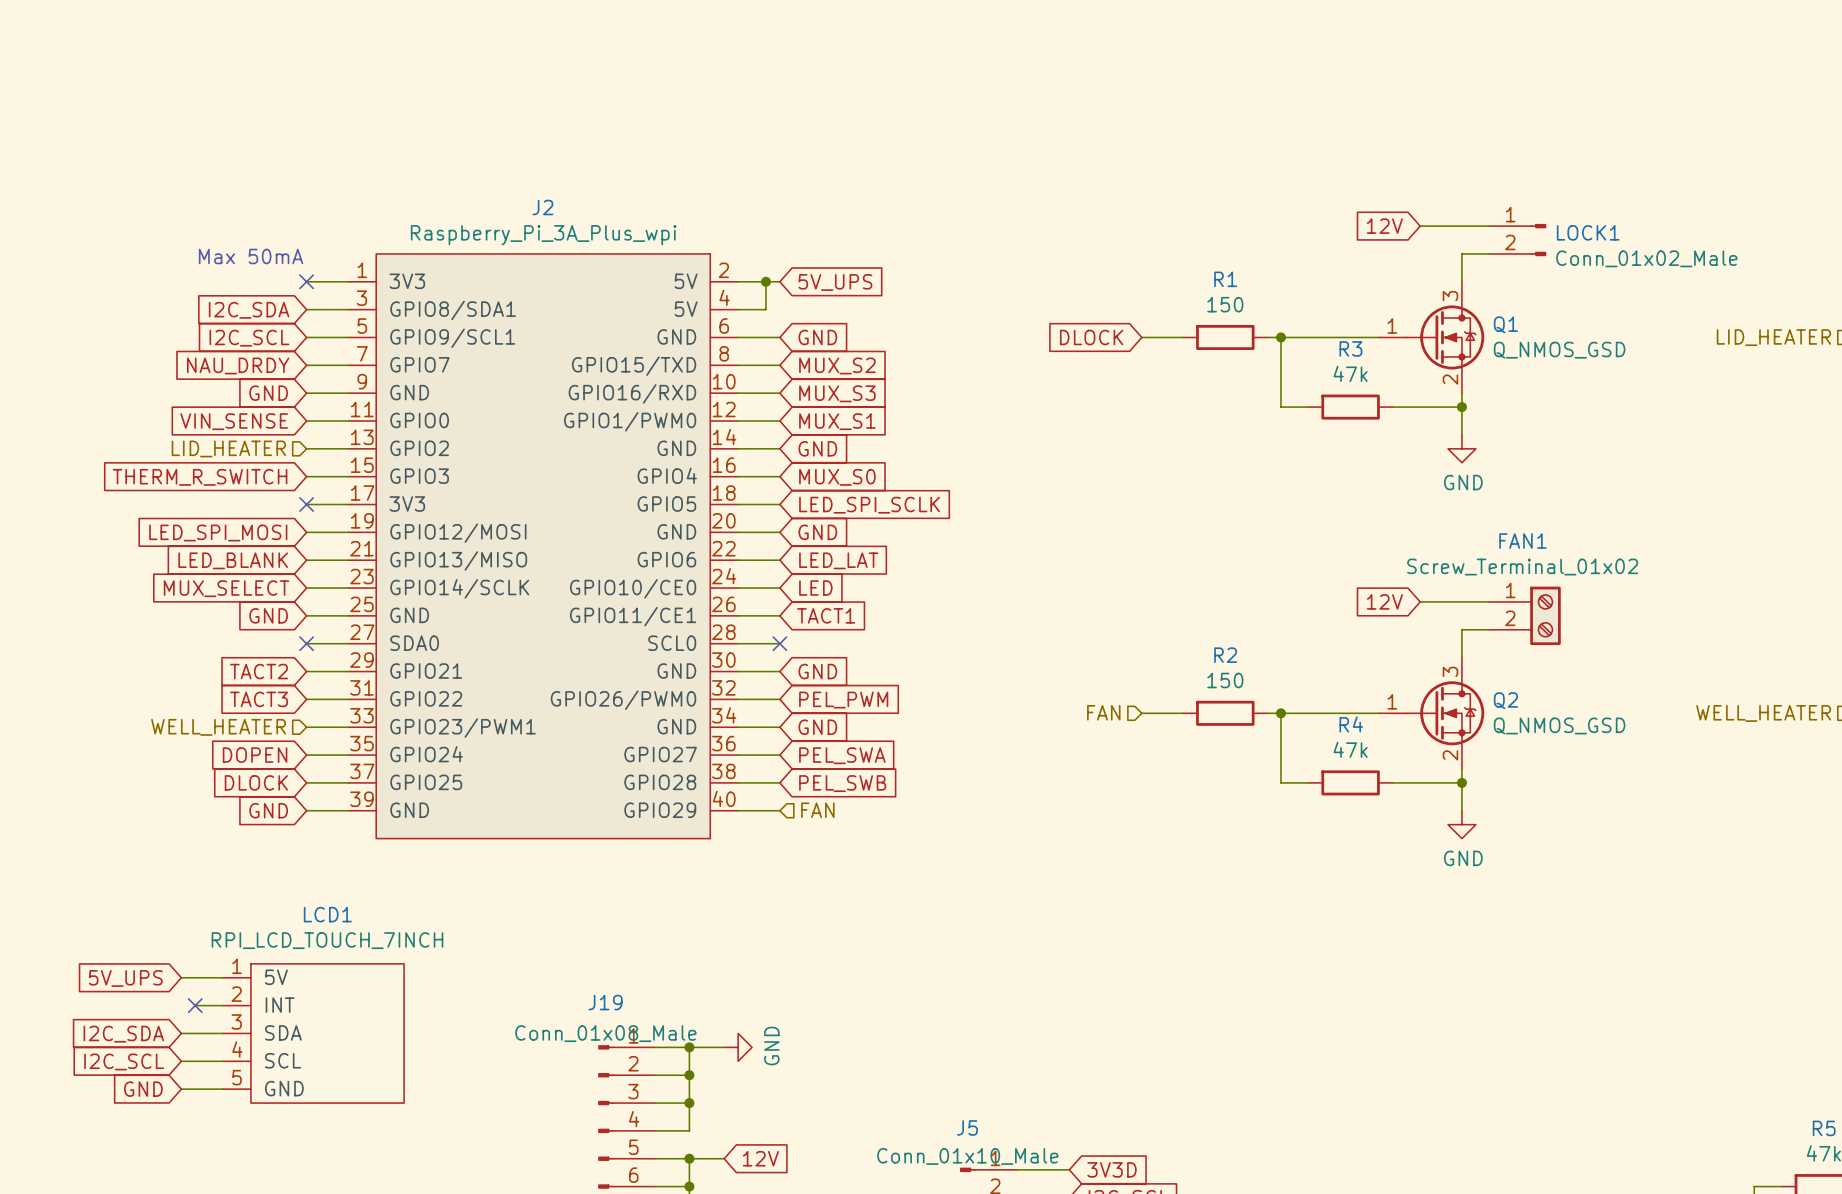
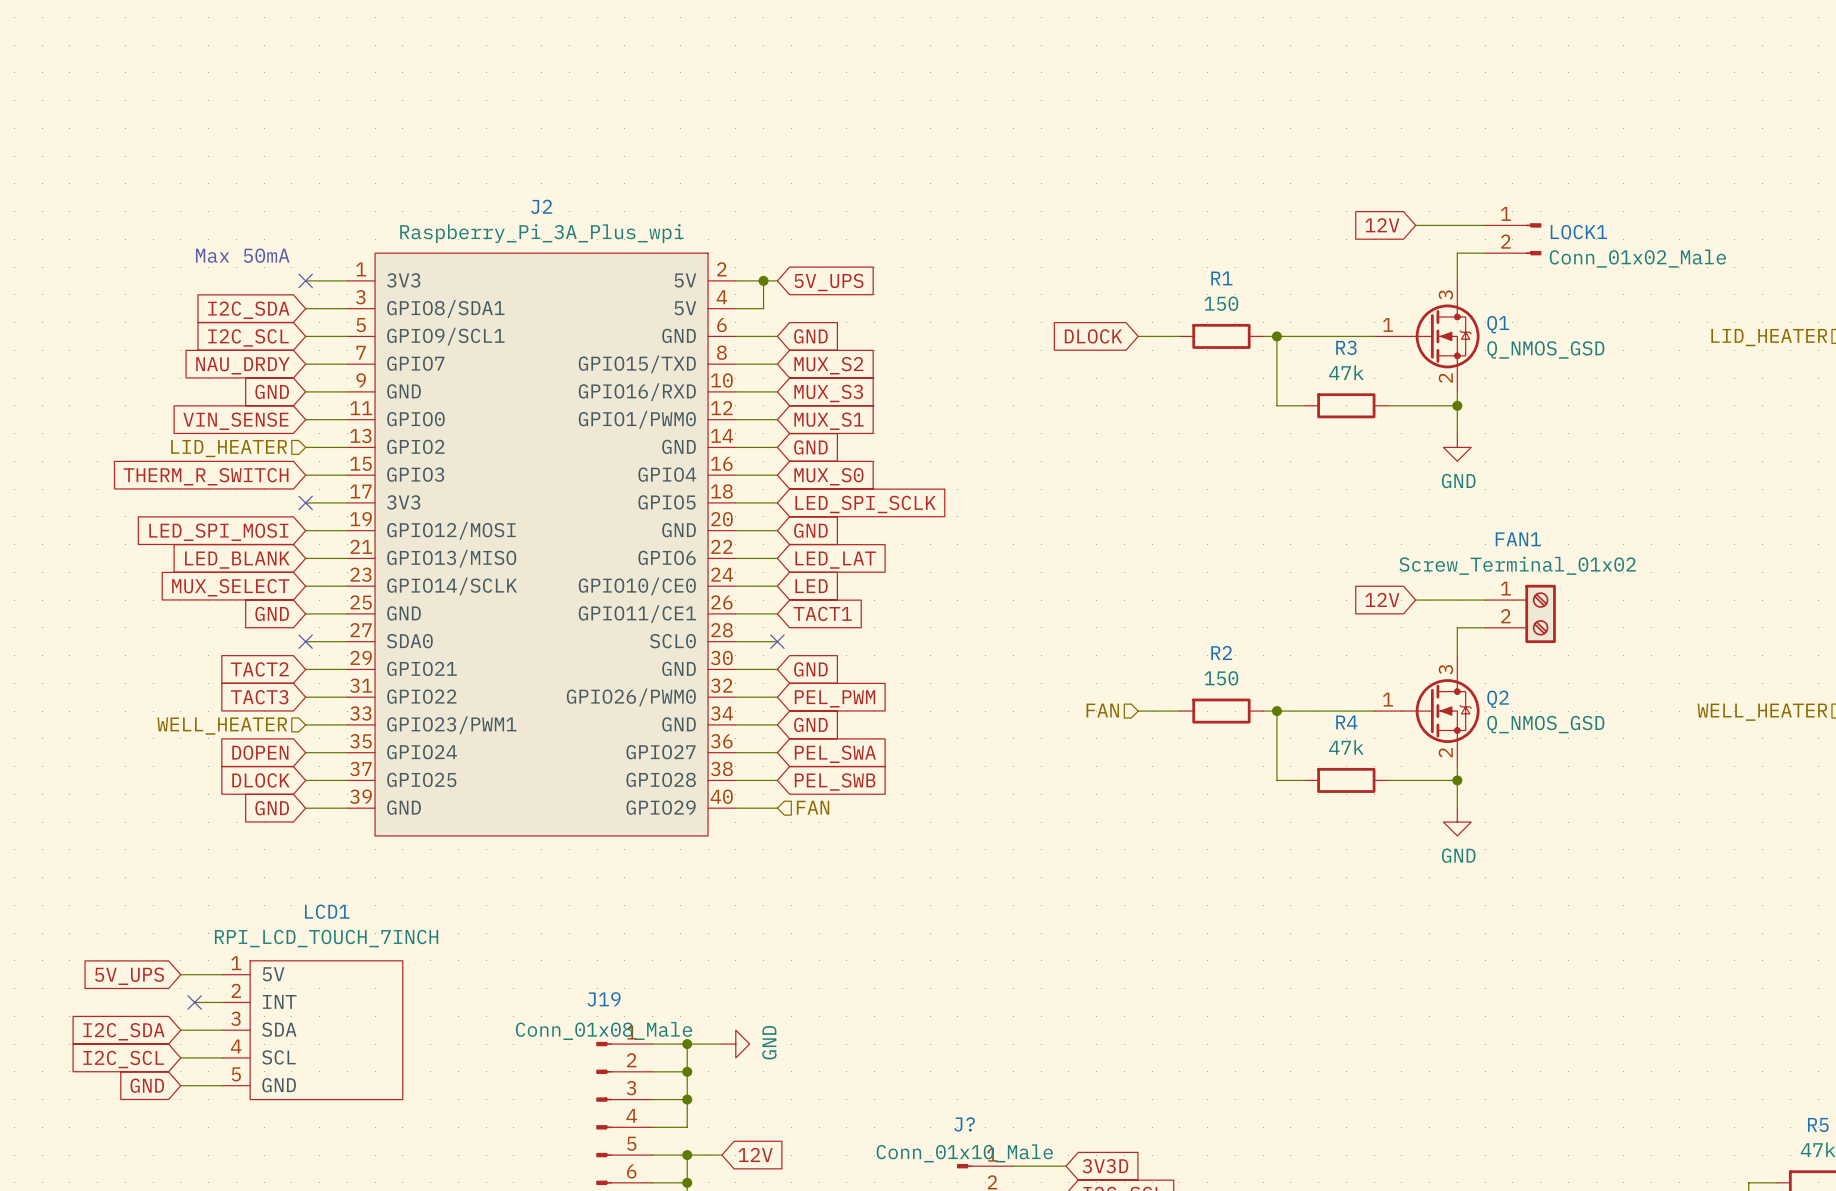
J5 name: J5 (967, 1127) -> J? (964, 1124)

